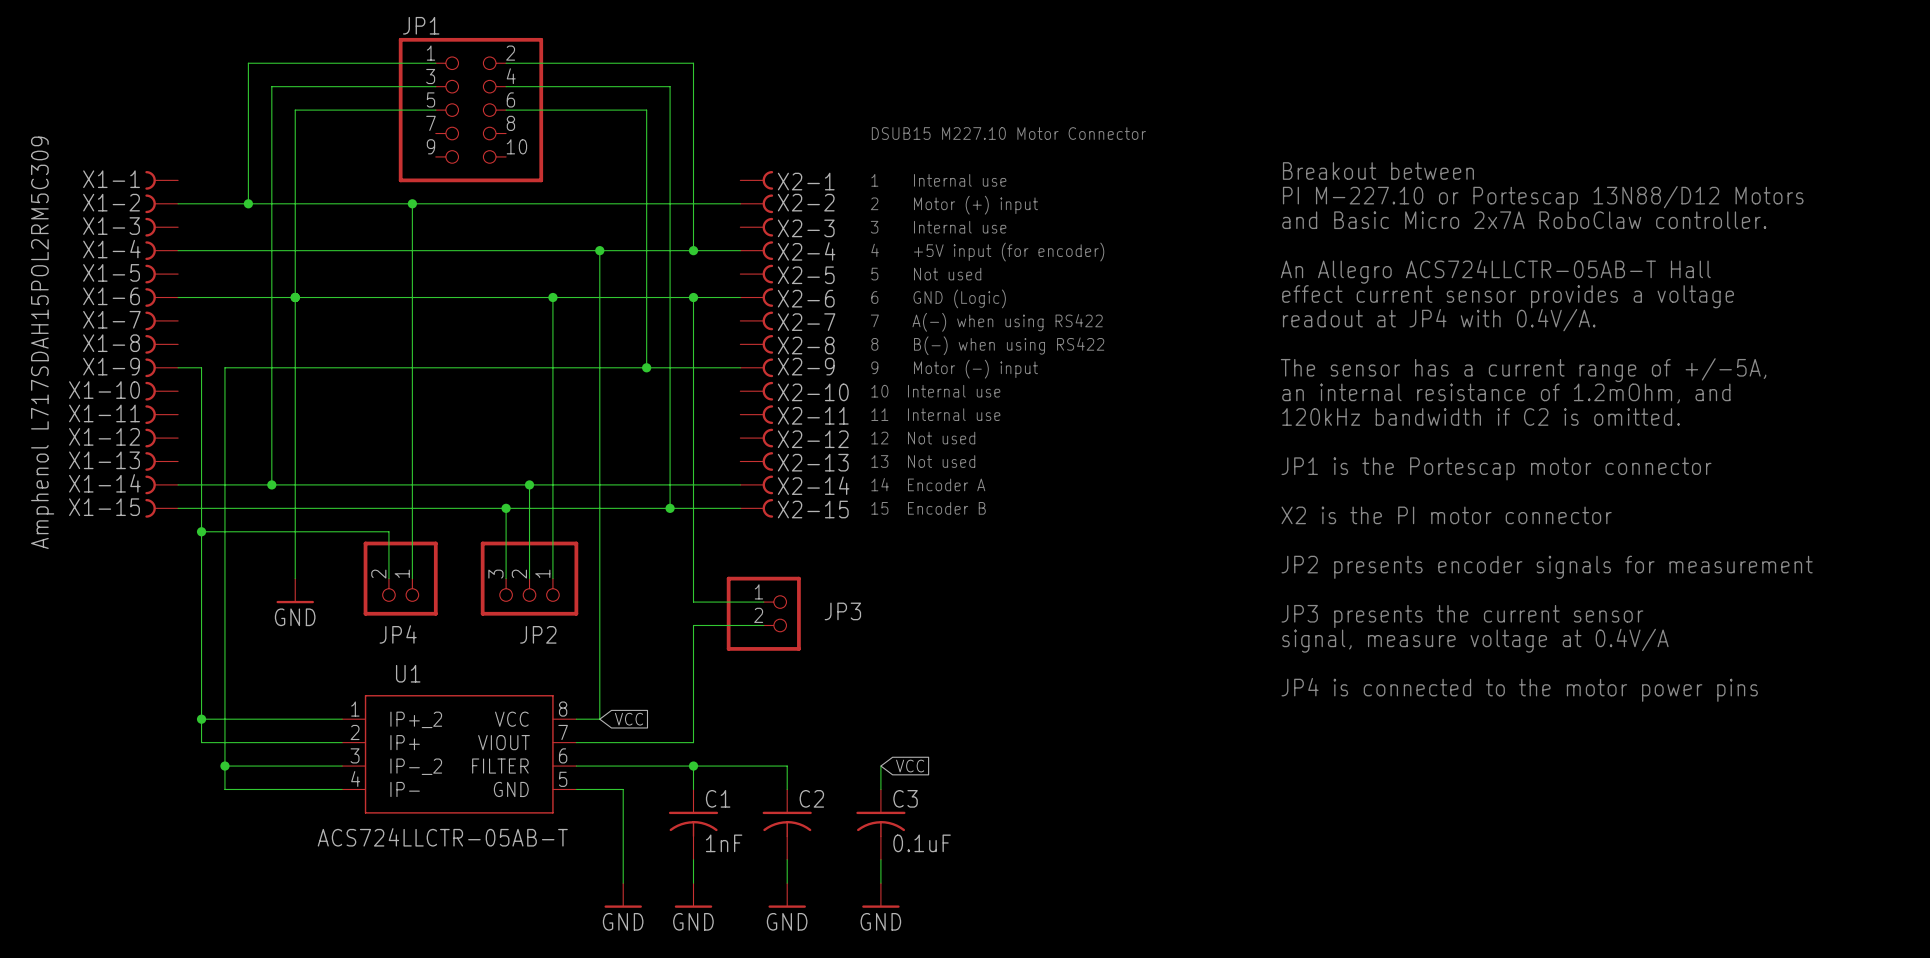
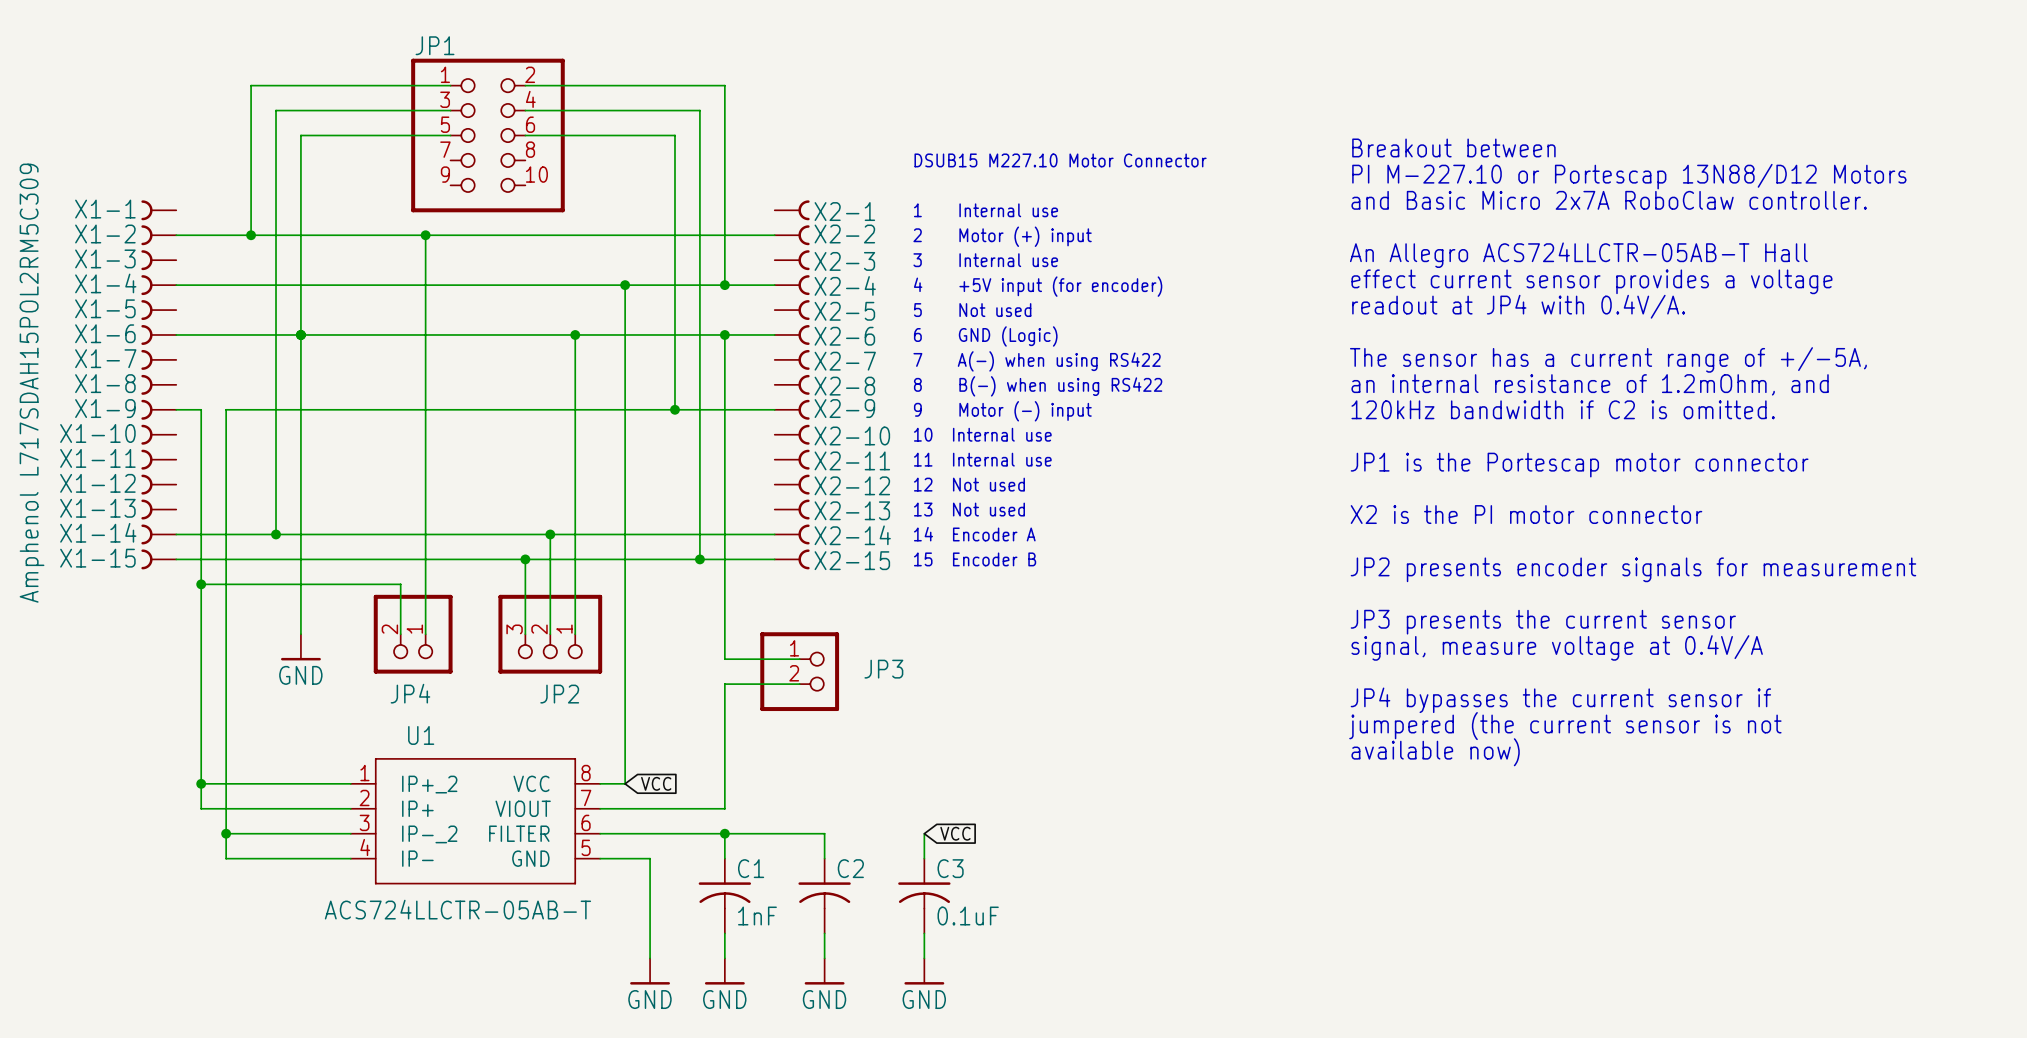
text: none -> Breakout between (1453, 147)
text: Breakout between (1378, 171) -> and Basic Micro 2x7A RoboClaw controller. (1609, 200)
text position: PI M-227.10 or Portescap 13N88/D12 Motors (1543, 197) -> PI M-227.10 or Portescap 13N88/D12 Motors (1629, 176)
text: and Basic Micro 2x7A RoboClaw controller. (1524, 220) -> An Allegro ACS724LLCTR-05AB-T Hall (1578, 255)
text: An Allegro ACS724LLCTR-05AB-T Hall (1495, 271) -> readout at JP4 with 0.4V/A. (1518, 306)
text position: effect current sensor provides a voltage (1508, 296) -> effect current sensor provides a voltage (1591, 281)
text: readout at JP4 with 0.4V/A. (1439, 320) -> The sensor has a current range of +/-5A, (1608, 359)
text: The sensor has a current range of +/-5A, (1523, 370) -> 120kHz bandwidth if C2 is omitted. (1563, 409)
text position: an internal resistance of 1.2mOhm, and (1506, 393) -> an internal resistance of 1.2mOhm, and (1590, 384)
text: 120kHz bandwidth if C2 is omitted. (1481, 416) -> JP1 is the Portescap motor connector (1579, 465)
text: JP1 is the Portescap motor connector (1496, 468) -> X2 is the PI motor connector (1526, 514)
text: X2 is the PI motor connector (1446, 515) -> JP2 presents encoder signals for measurement (1633, 569)
text: JP2 presents encoder signals for measurement (1547, 567) -> JP3 presents the current sensor (1543, 622)
text: none -> signal, measure voltage at 0.4V/A (1557, 647)
text: JP3 presents the current sensor (1462, 616) -> none
text: signal, measure voltage at 0.4V/A (1475, 640) -> JP4 bypasses the current sensor if (1560, 700)
text: none -> jumpered (the current sensor is not (1565, 726)
text: JP4 is connected to the motor power pins (1519, 689) -> available now) (1435, 752)

